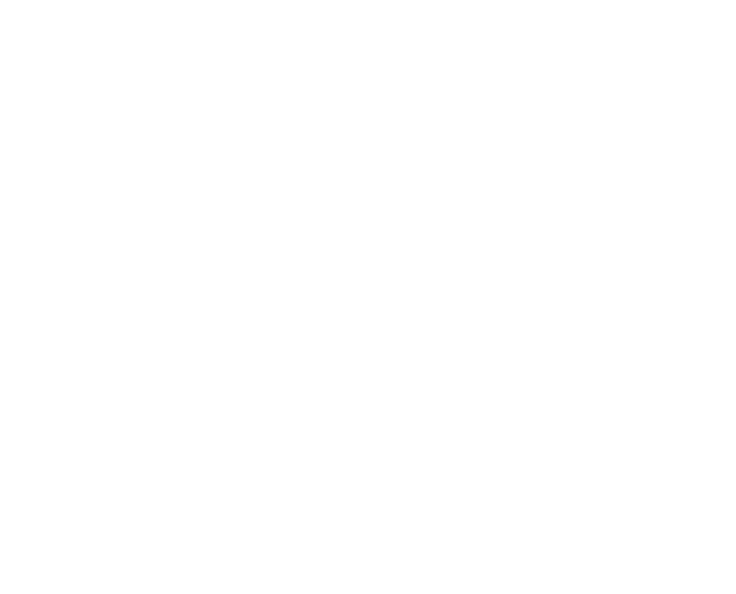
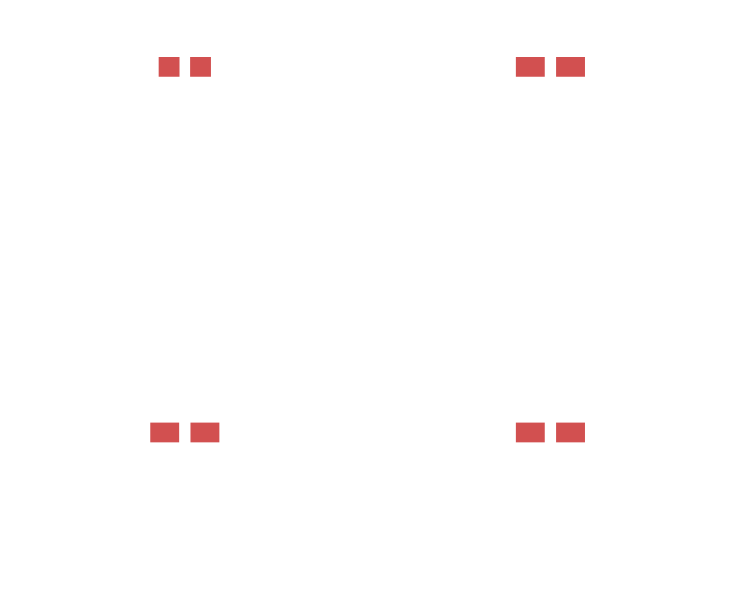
part: none -> (184, 66)
part: none -> (550, 66)
part: none -> (184, 432)
part: none -> (550, 432)

